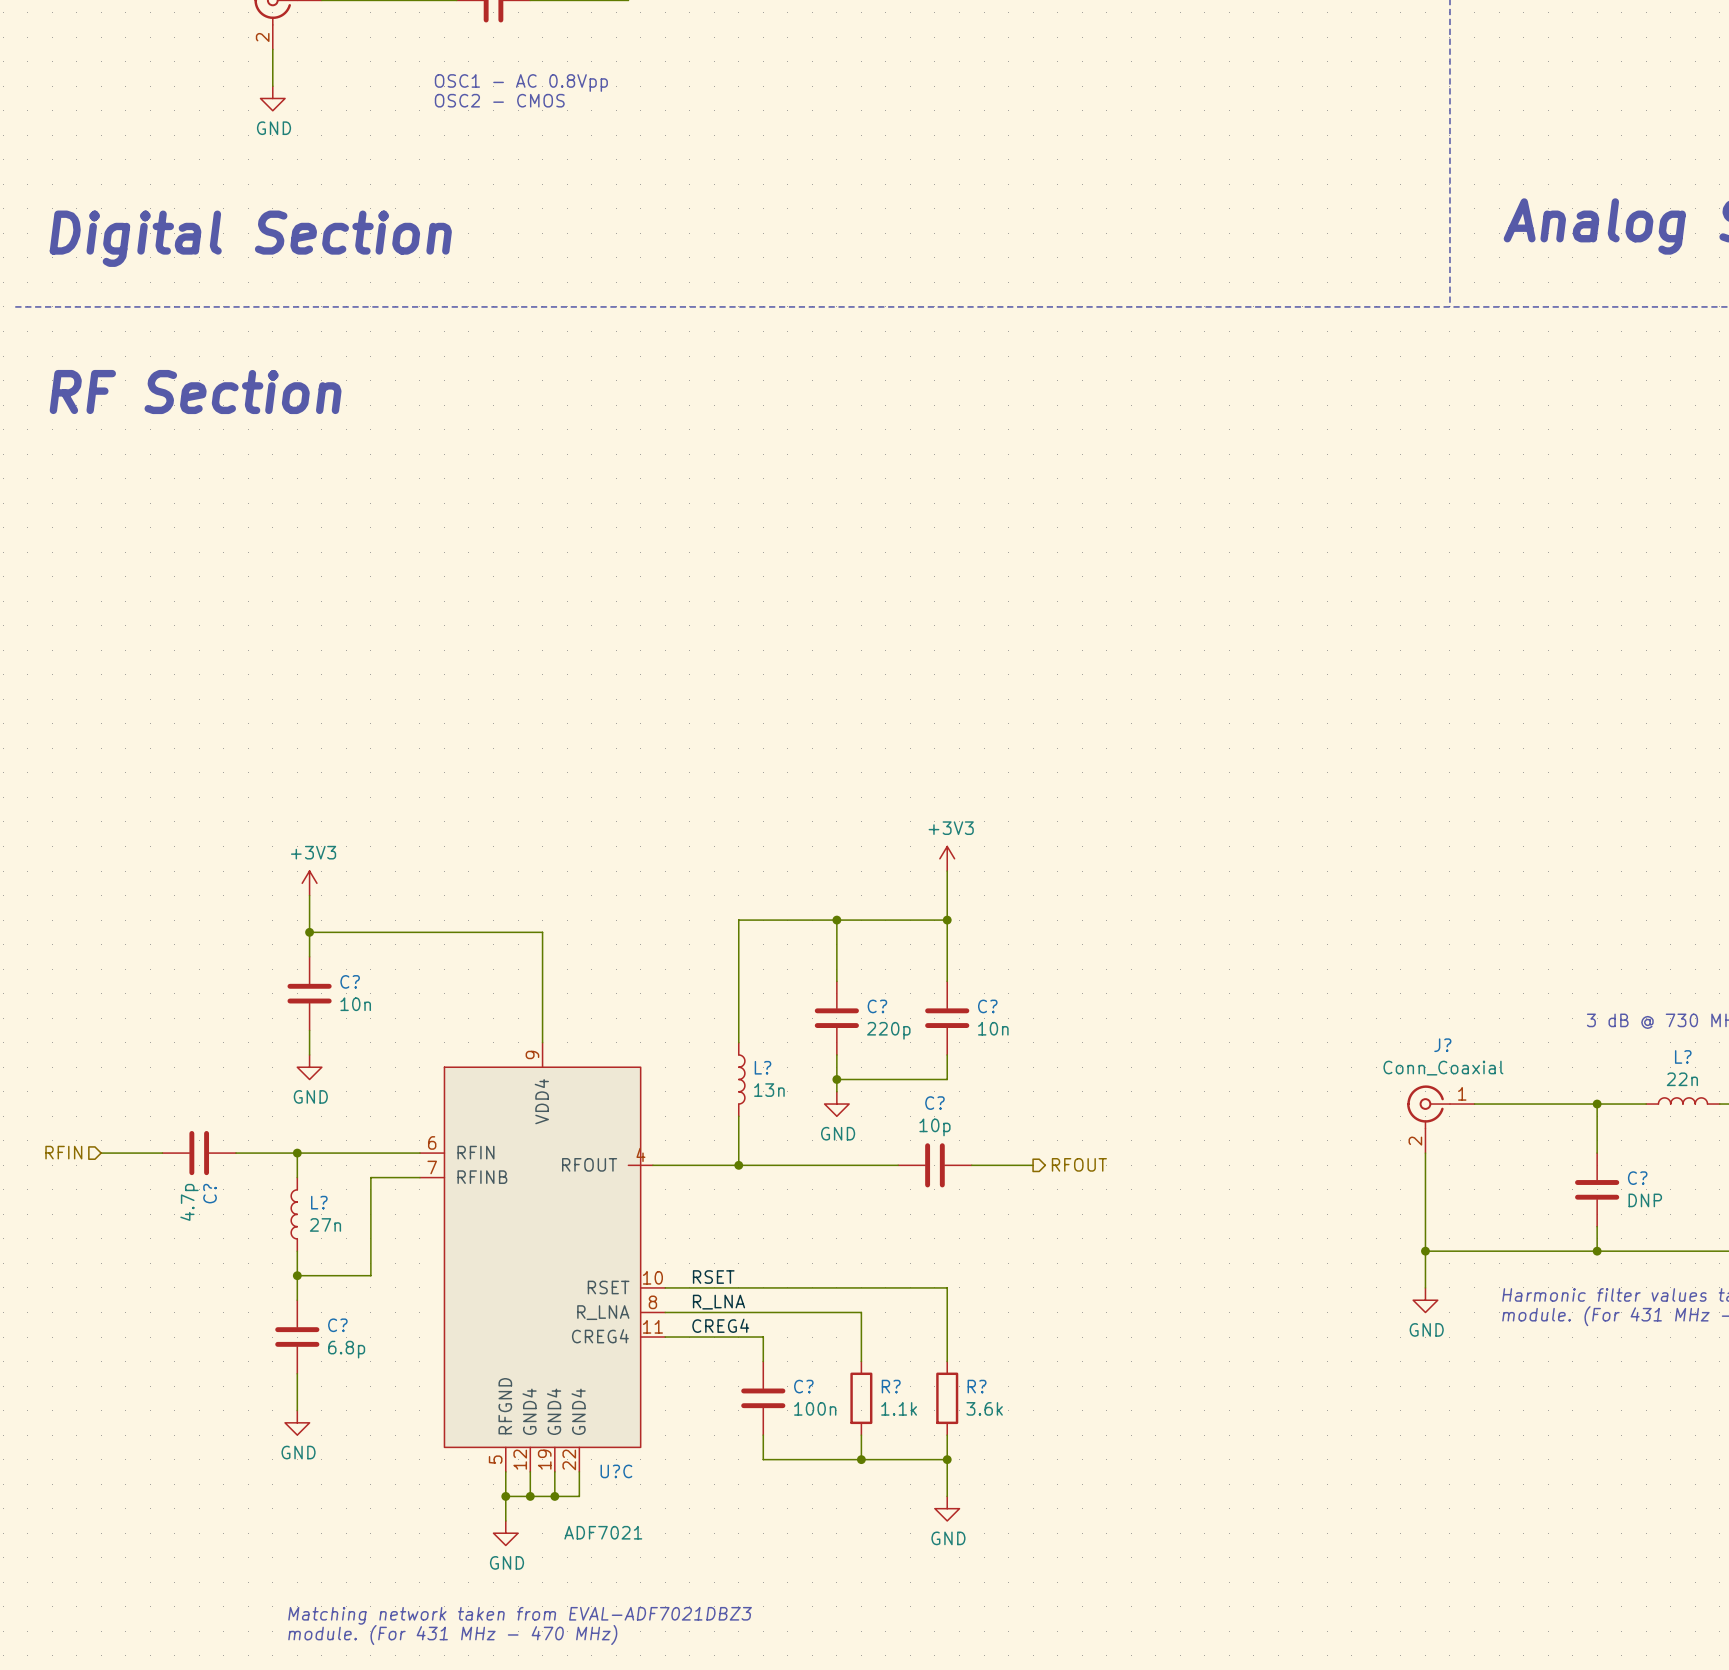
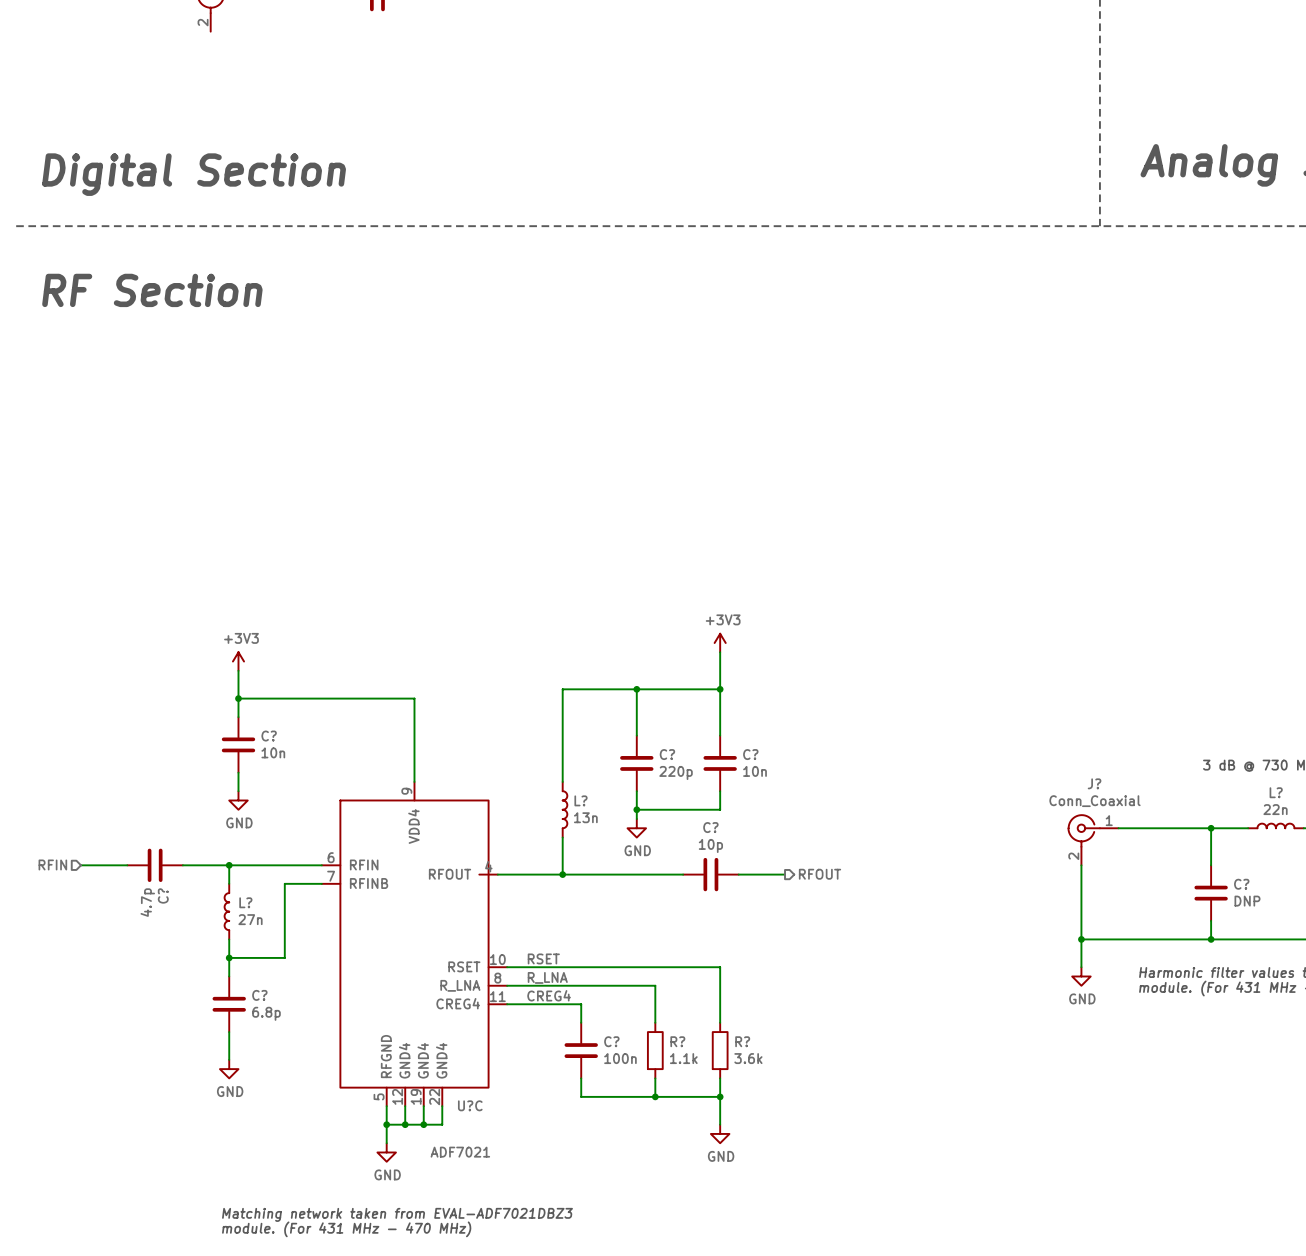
wire: (272, 49) (272, 86) -> none
text: OSC1 - AC 0.8Vpp (521, 83) -> none
power symbol: GND (272, 98) -> none
text: OSC2 - CMOS (499, 100) -> none

